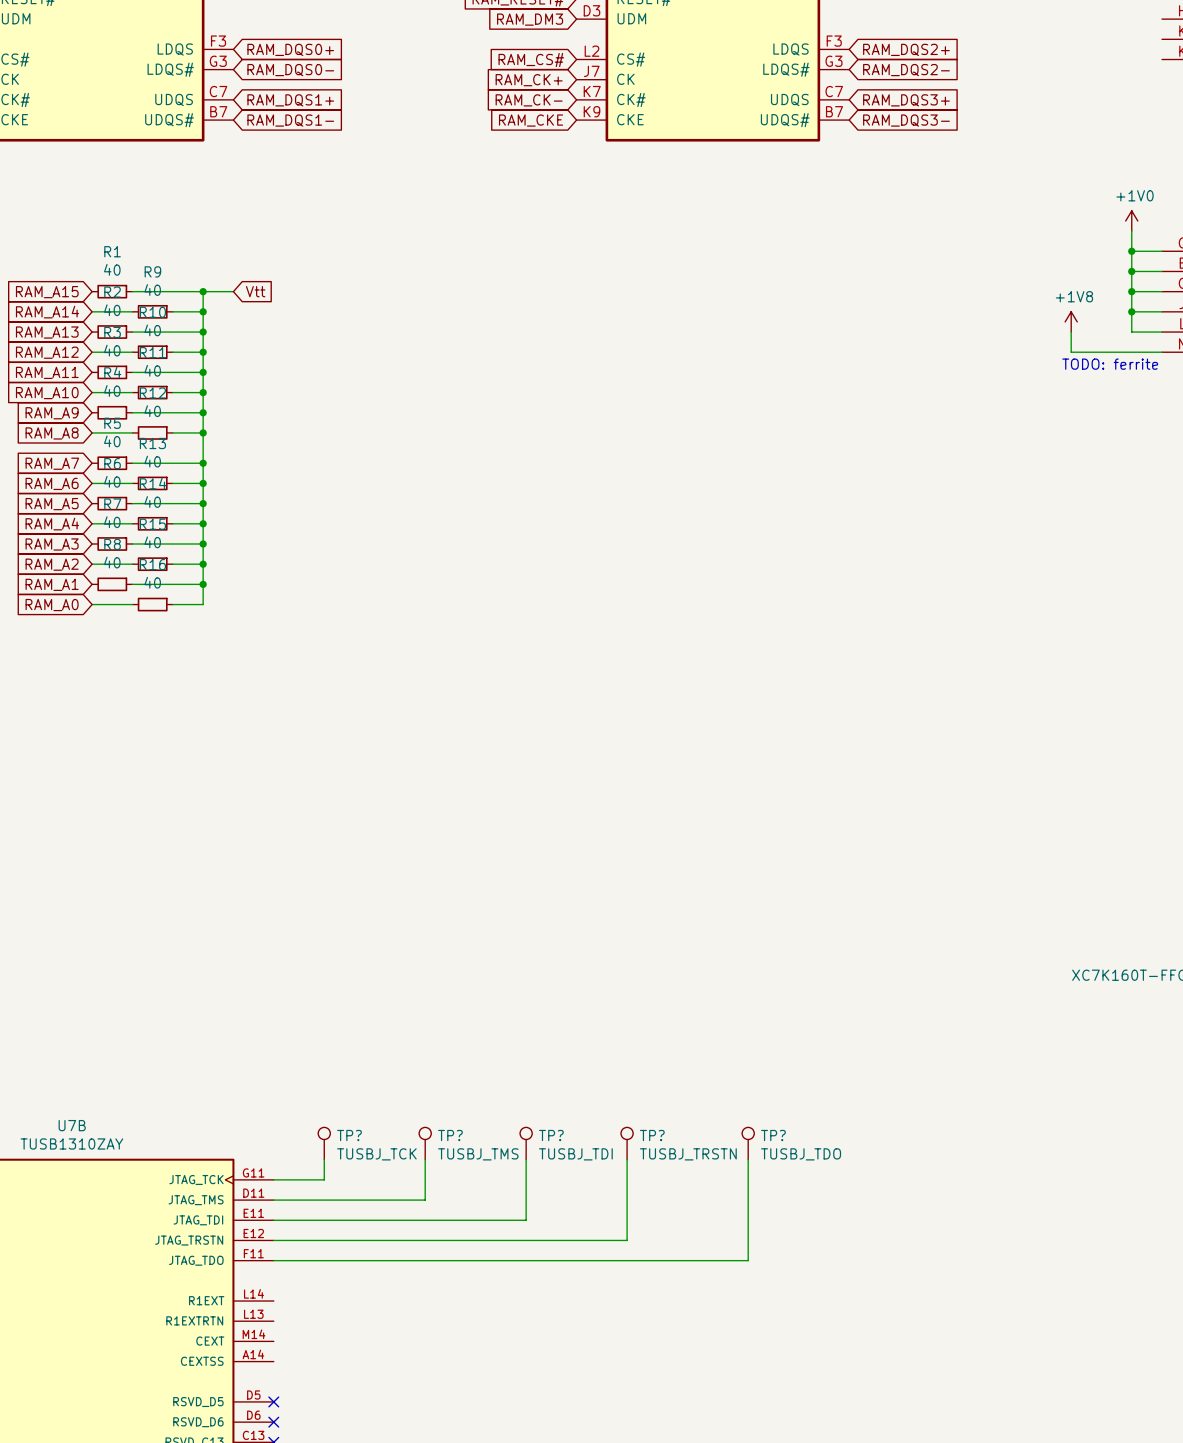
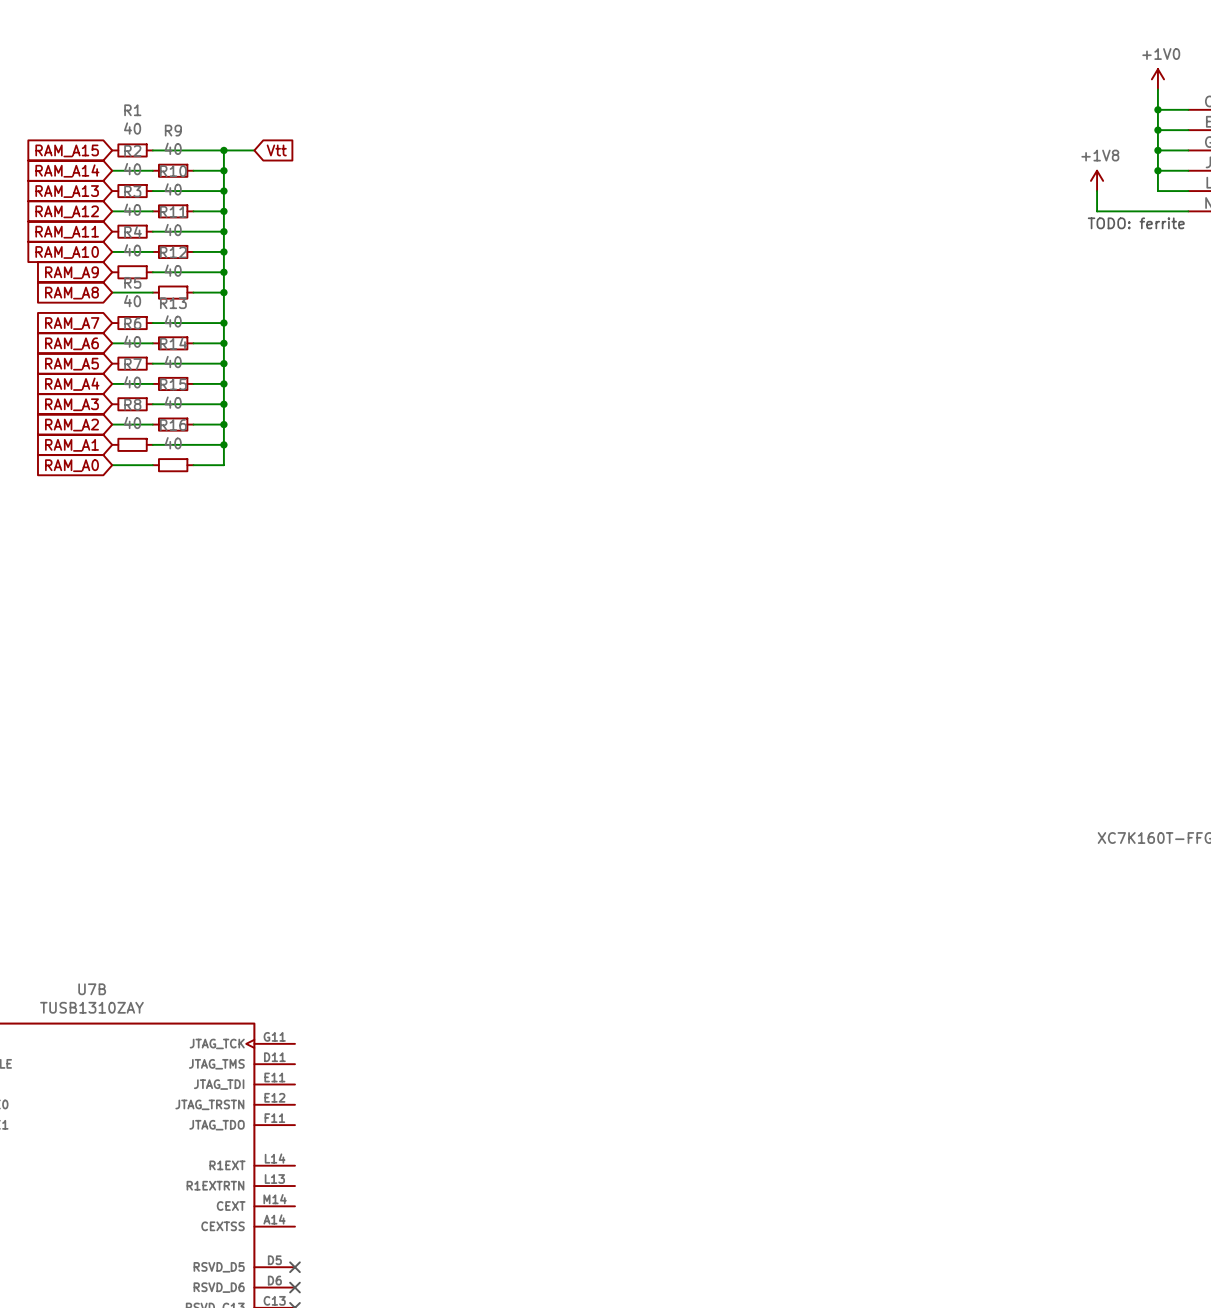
TP?: TUSBJ_TCK (324, 1143) -> none
TP?: TUSBJ_TMS (425, 1143) -> none
TP?: TUSBJ_TDI (526, 1143) -> none
TP?: TUSBJ_TRSTN (627, 1143) -> none
TP?: TUSBJ_TDO (748, 1143) -> none
wire: (324, 1159) (324, 1179) (273, 1179) -> none
wire: (425, 1159) (425, 1200) (273, 1200) -> none
wire: (526, 1159) (526, 1220) (273, 1220) -> none
wire: (627, 1159) (627, 1240) (273, 1240) -> none
wire: (748, 1159) (748, 1260) (273, 1260) -> none

